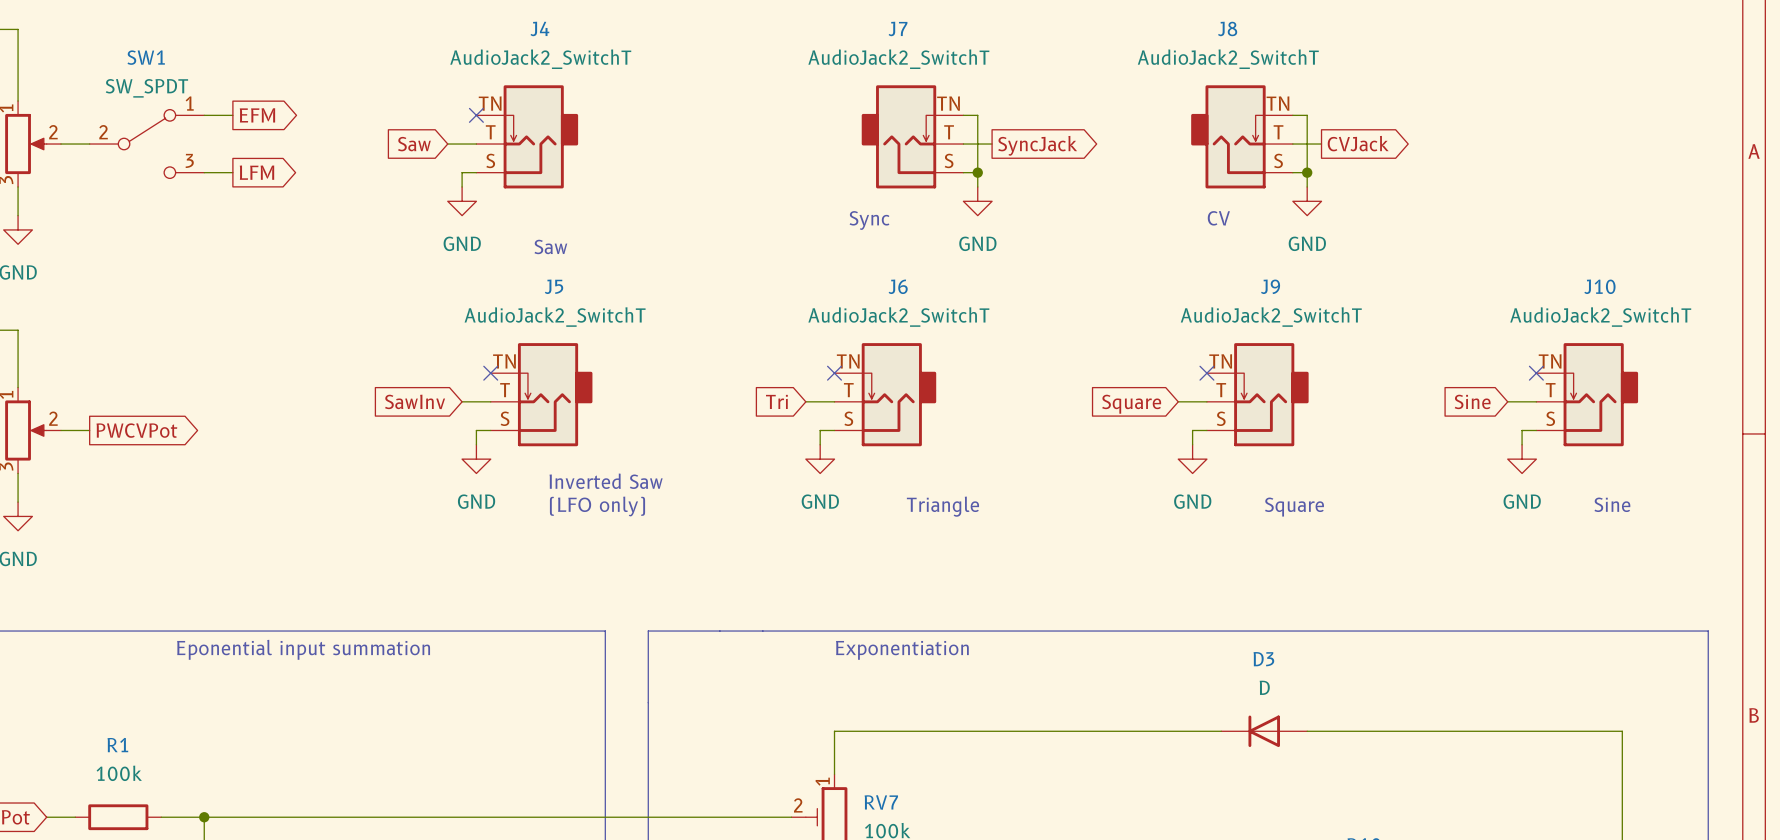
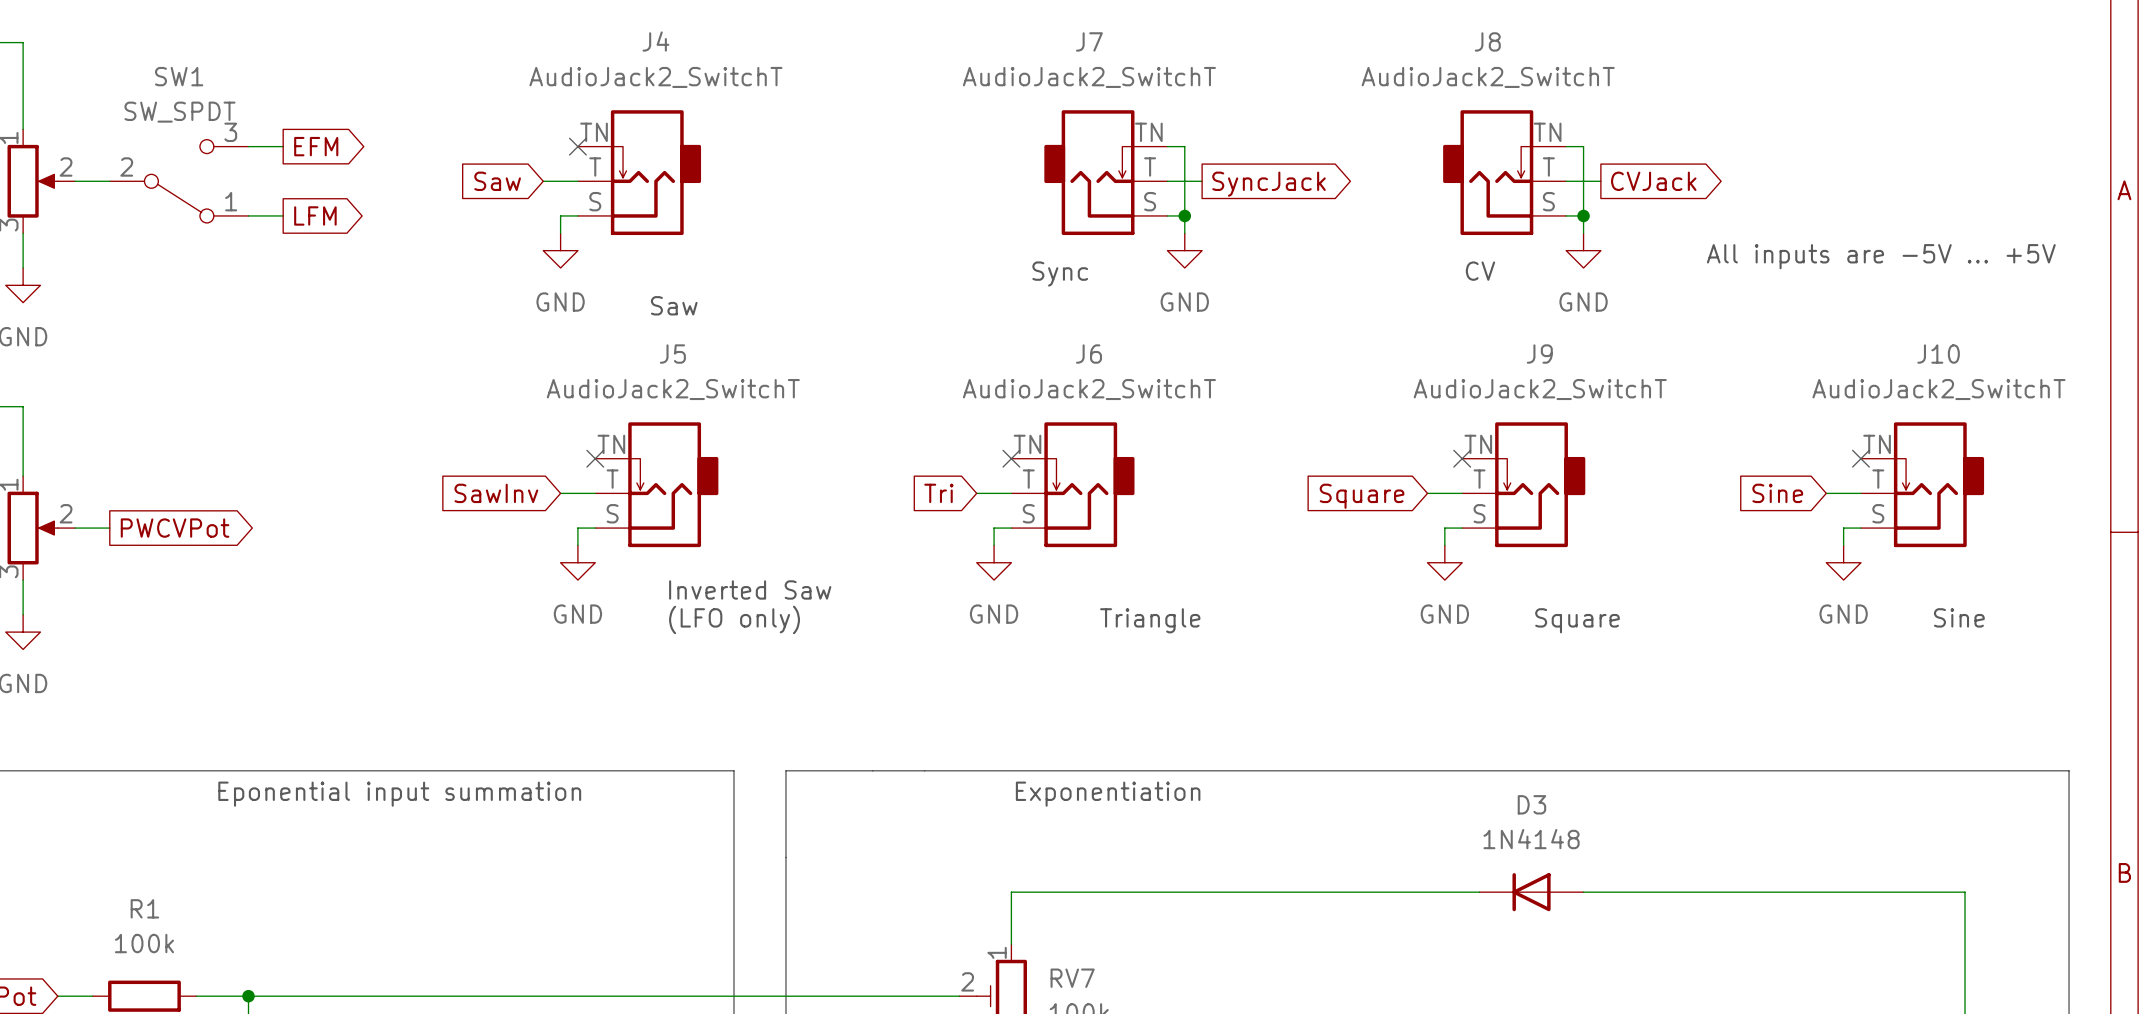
SW1 flip: as is (146, 144) -> up-down (179, 181)
text: none -> All inputs are -5V … +5V (1881, 256)
D3 value: D (1264, 687) -> 1N4148 (1531, 839)

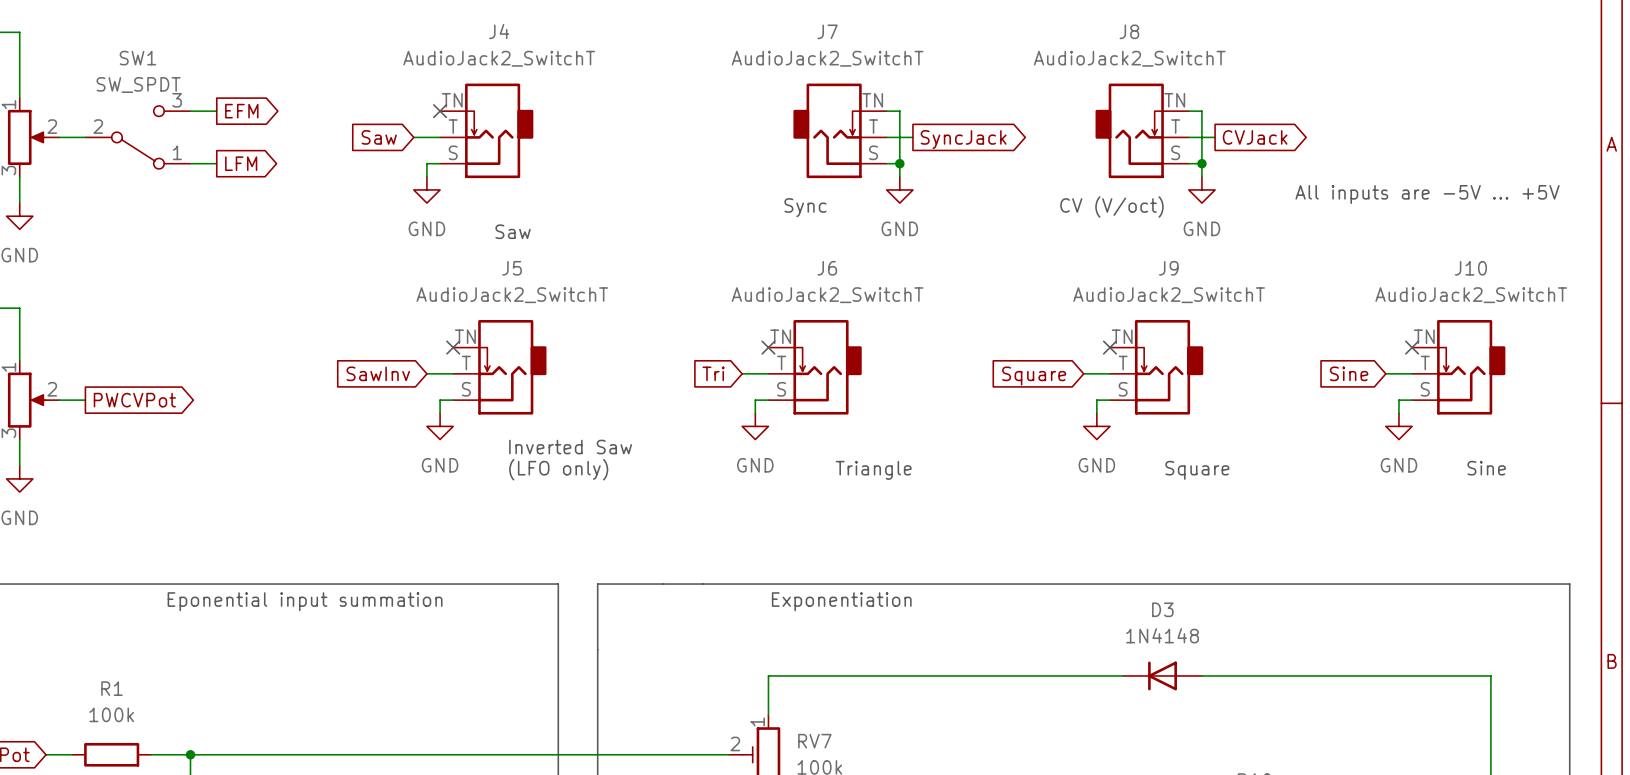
text: CV (1480, 271) -> none
text: none -> CV (V/oct) (1111, 207)

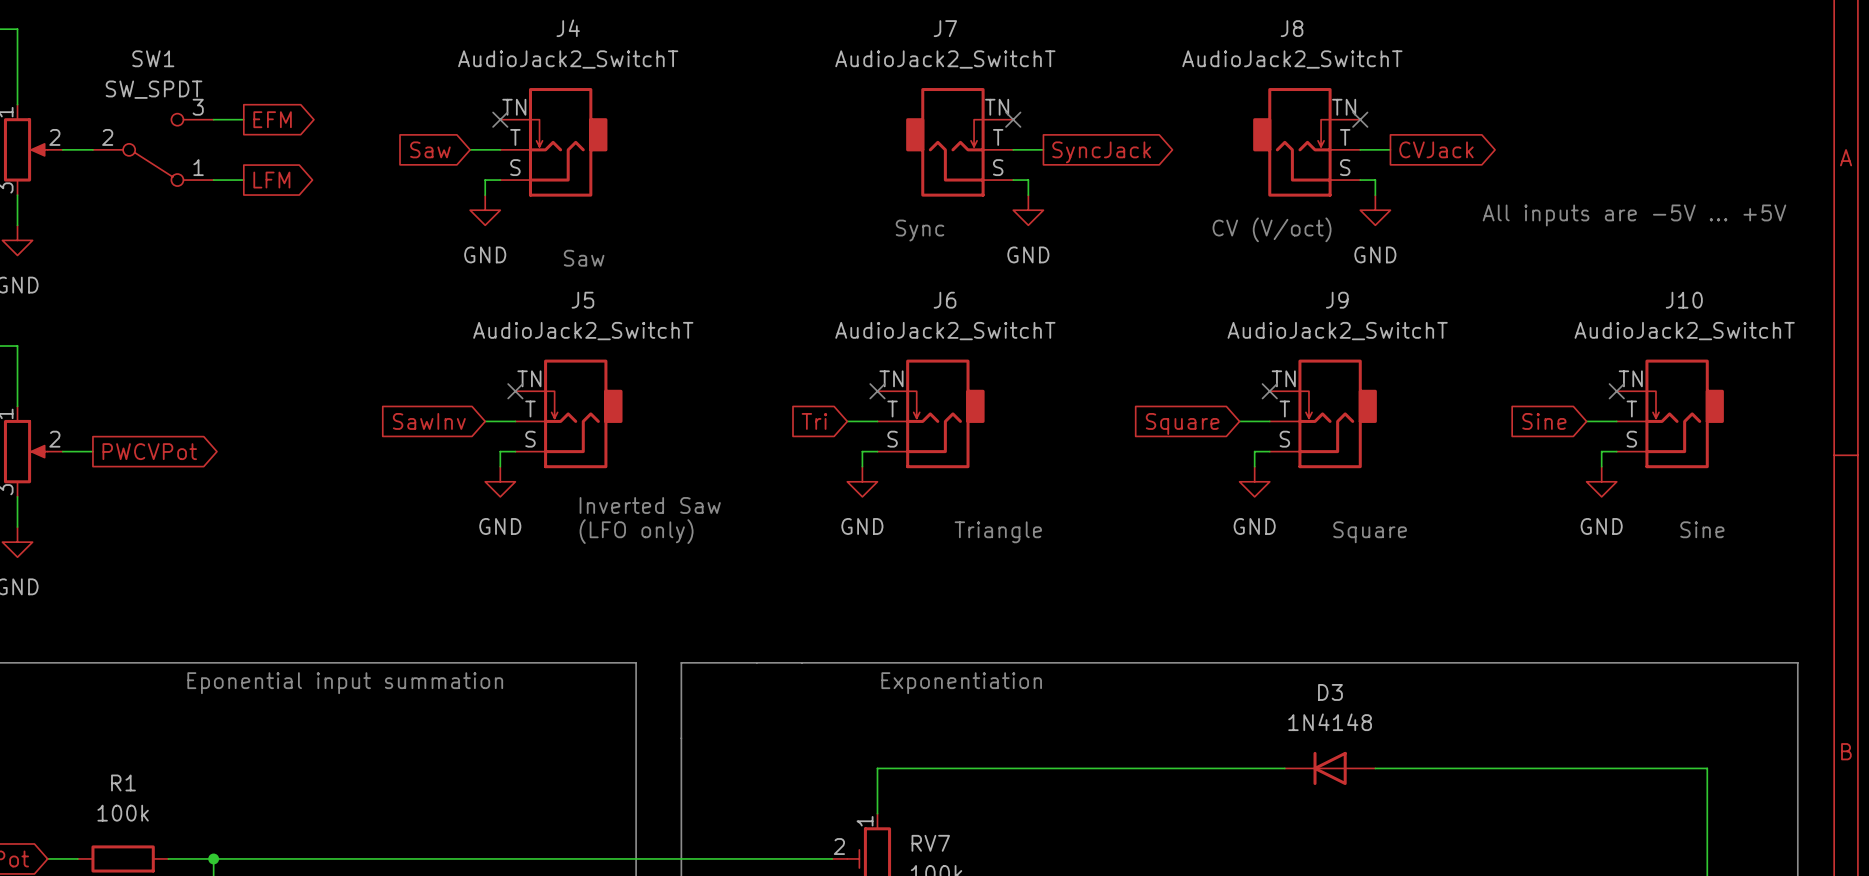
wire: (886, 111) (899, 111) (899, 163) -> none
no-connect mark: none -> (1013, 119)
wire: (1188, 111) (1201, 111) (1201, 163) -> none
no-connect mark: none -> (1360, 119)
junction: (899, 163) -> none
junction: (1201, 163) -> none

